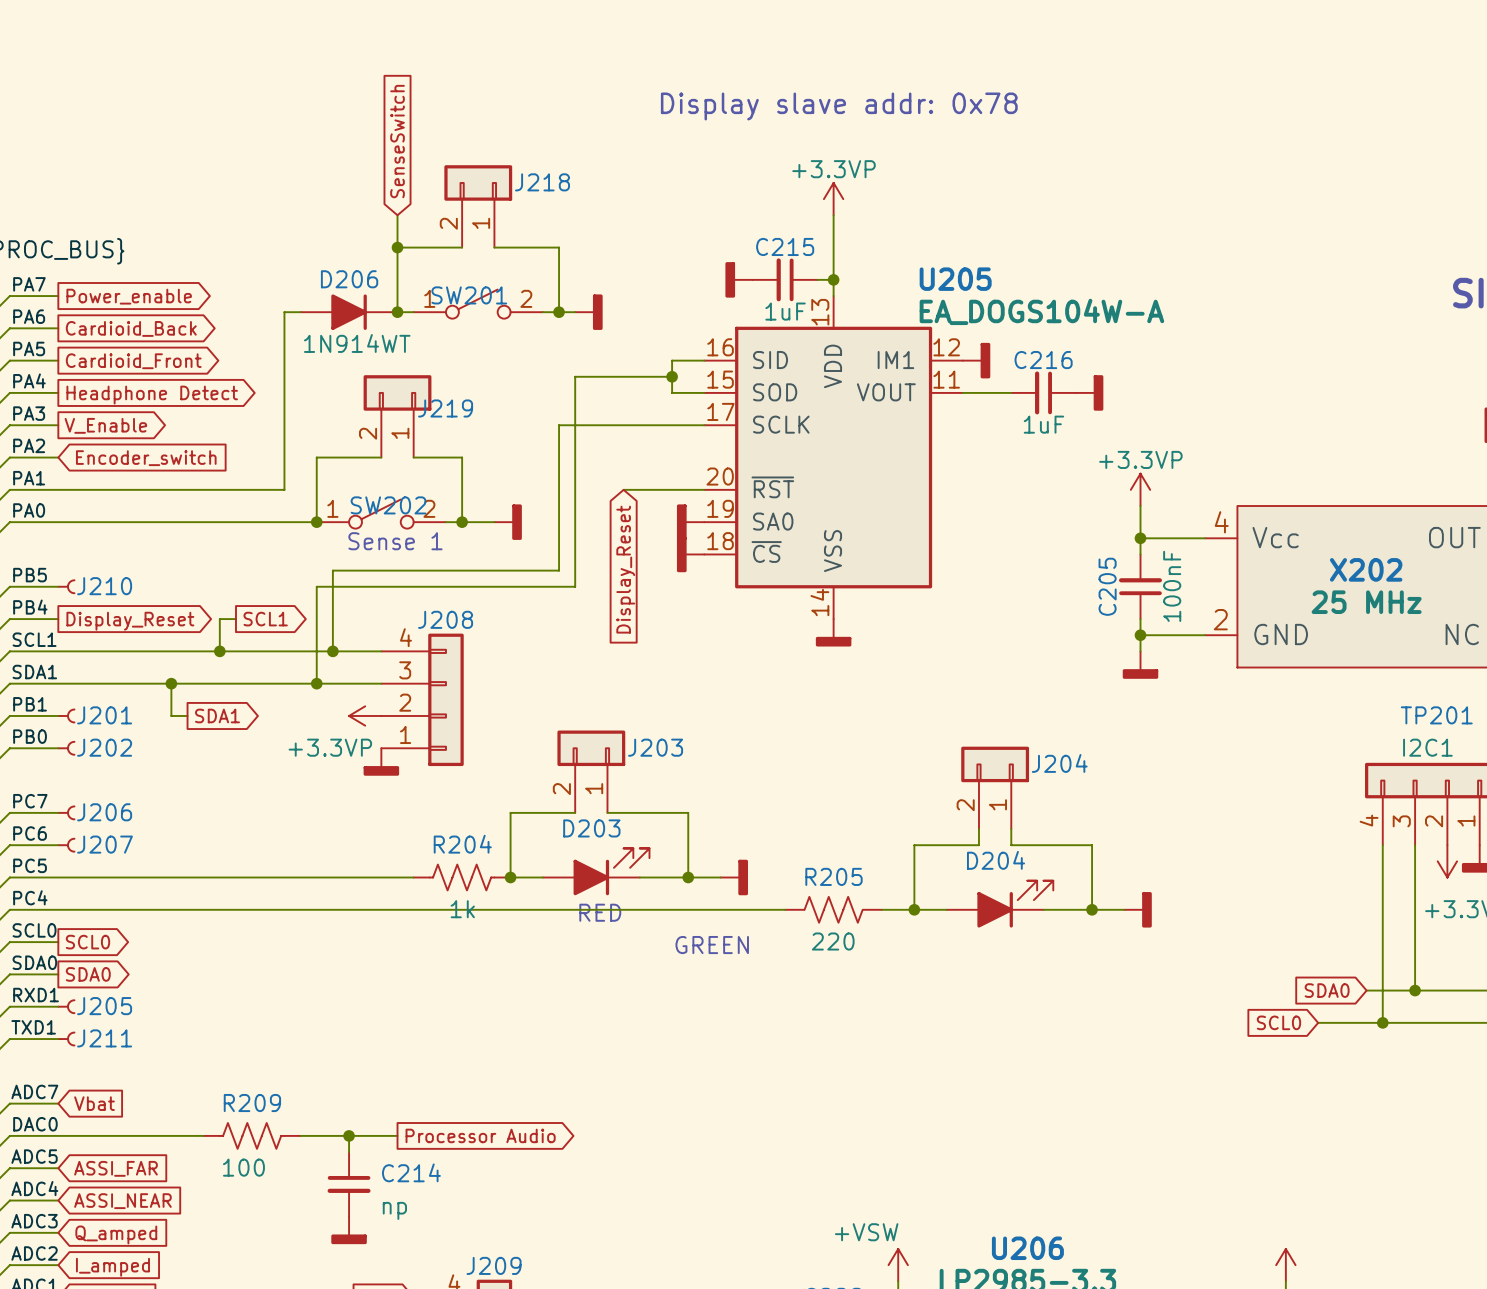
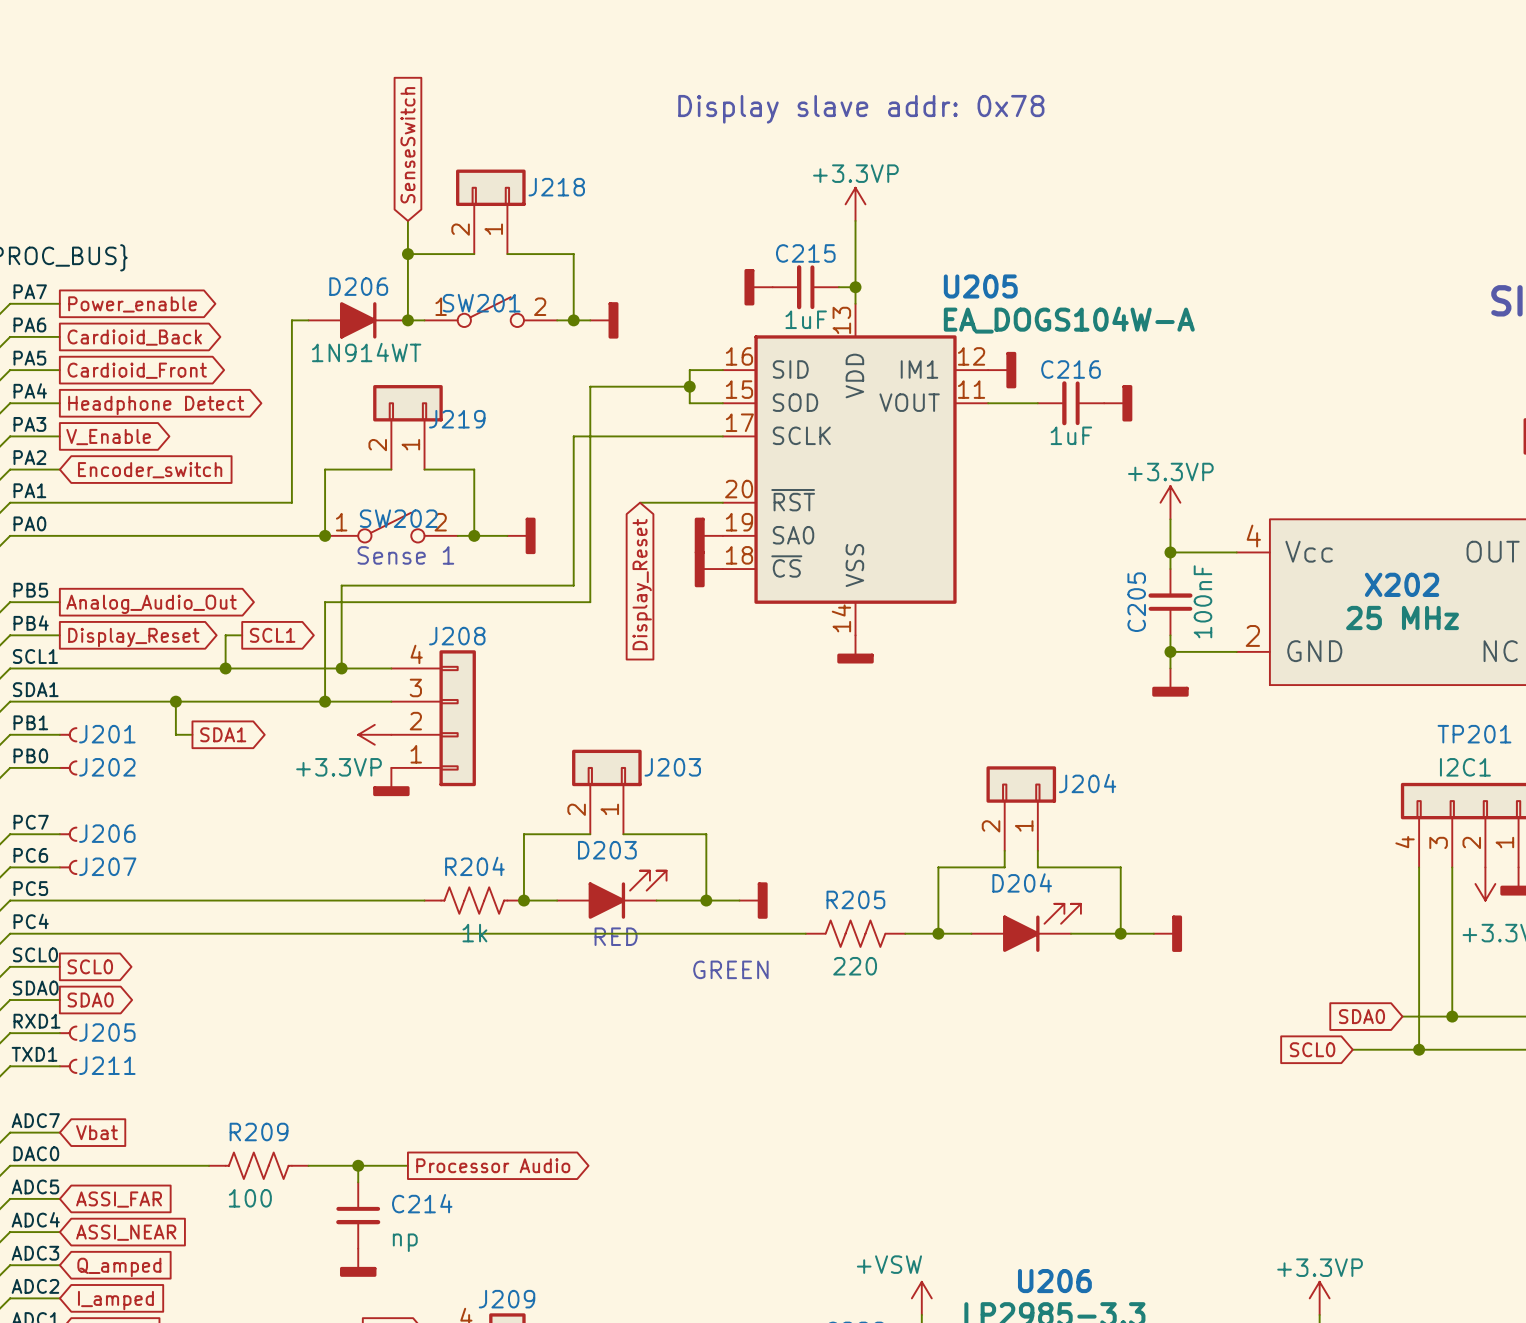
J210: (66, 586) -> none
global label: none -> Analog_Audio_Out (151, 604)
power symbol text: none -> +3.3VP (1320, 1267)

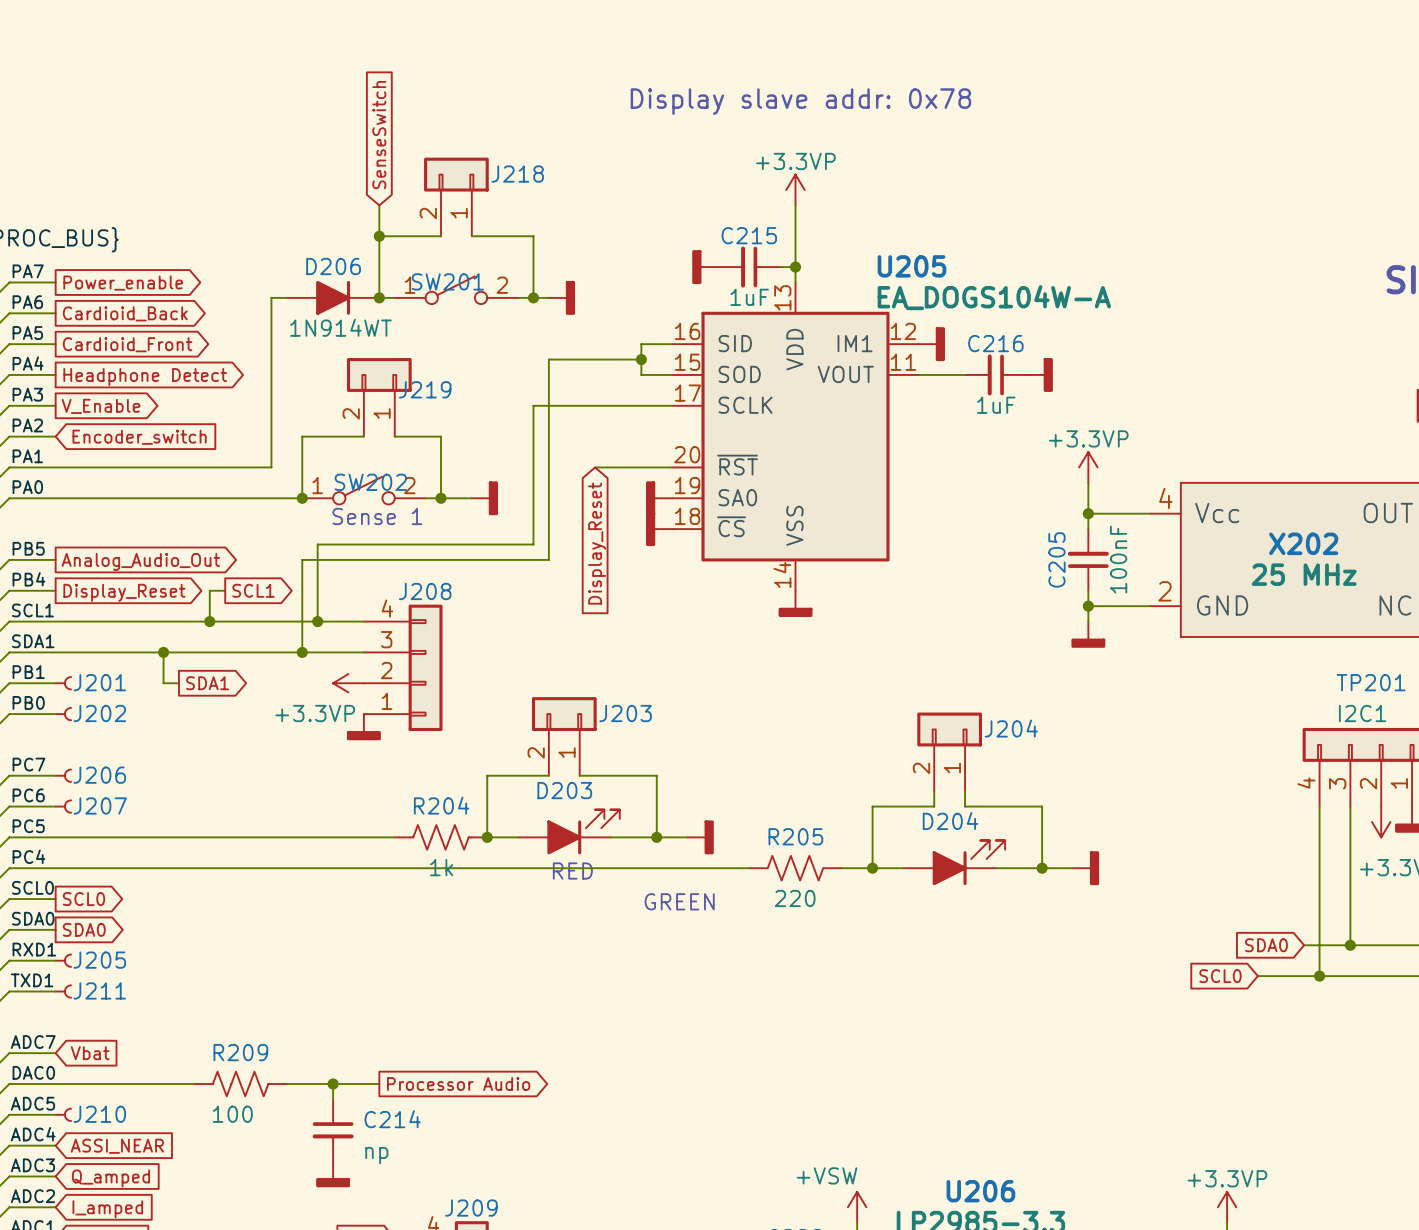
J210: none -> (63, 1114)
global label: ASSI_FAR (119, 1199) -> none

